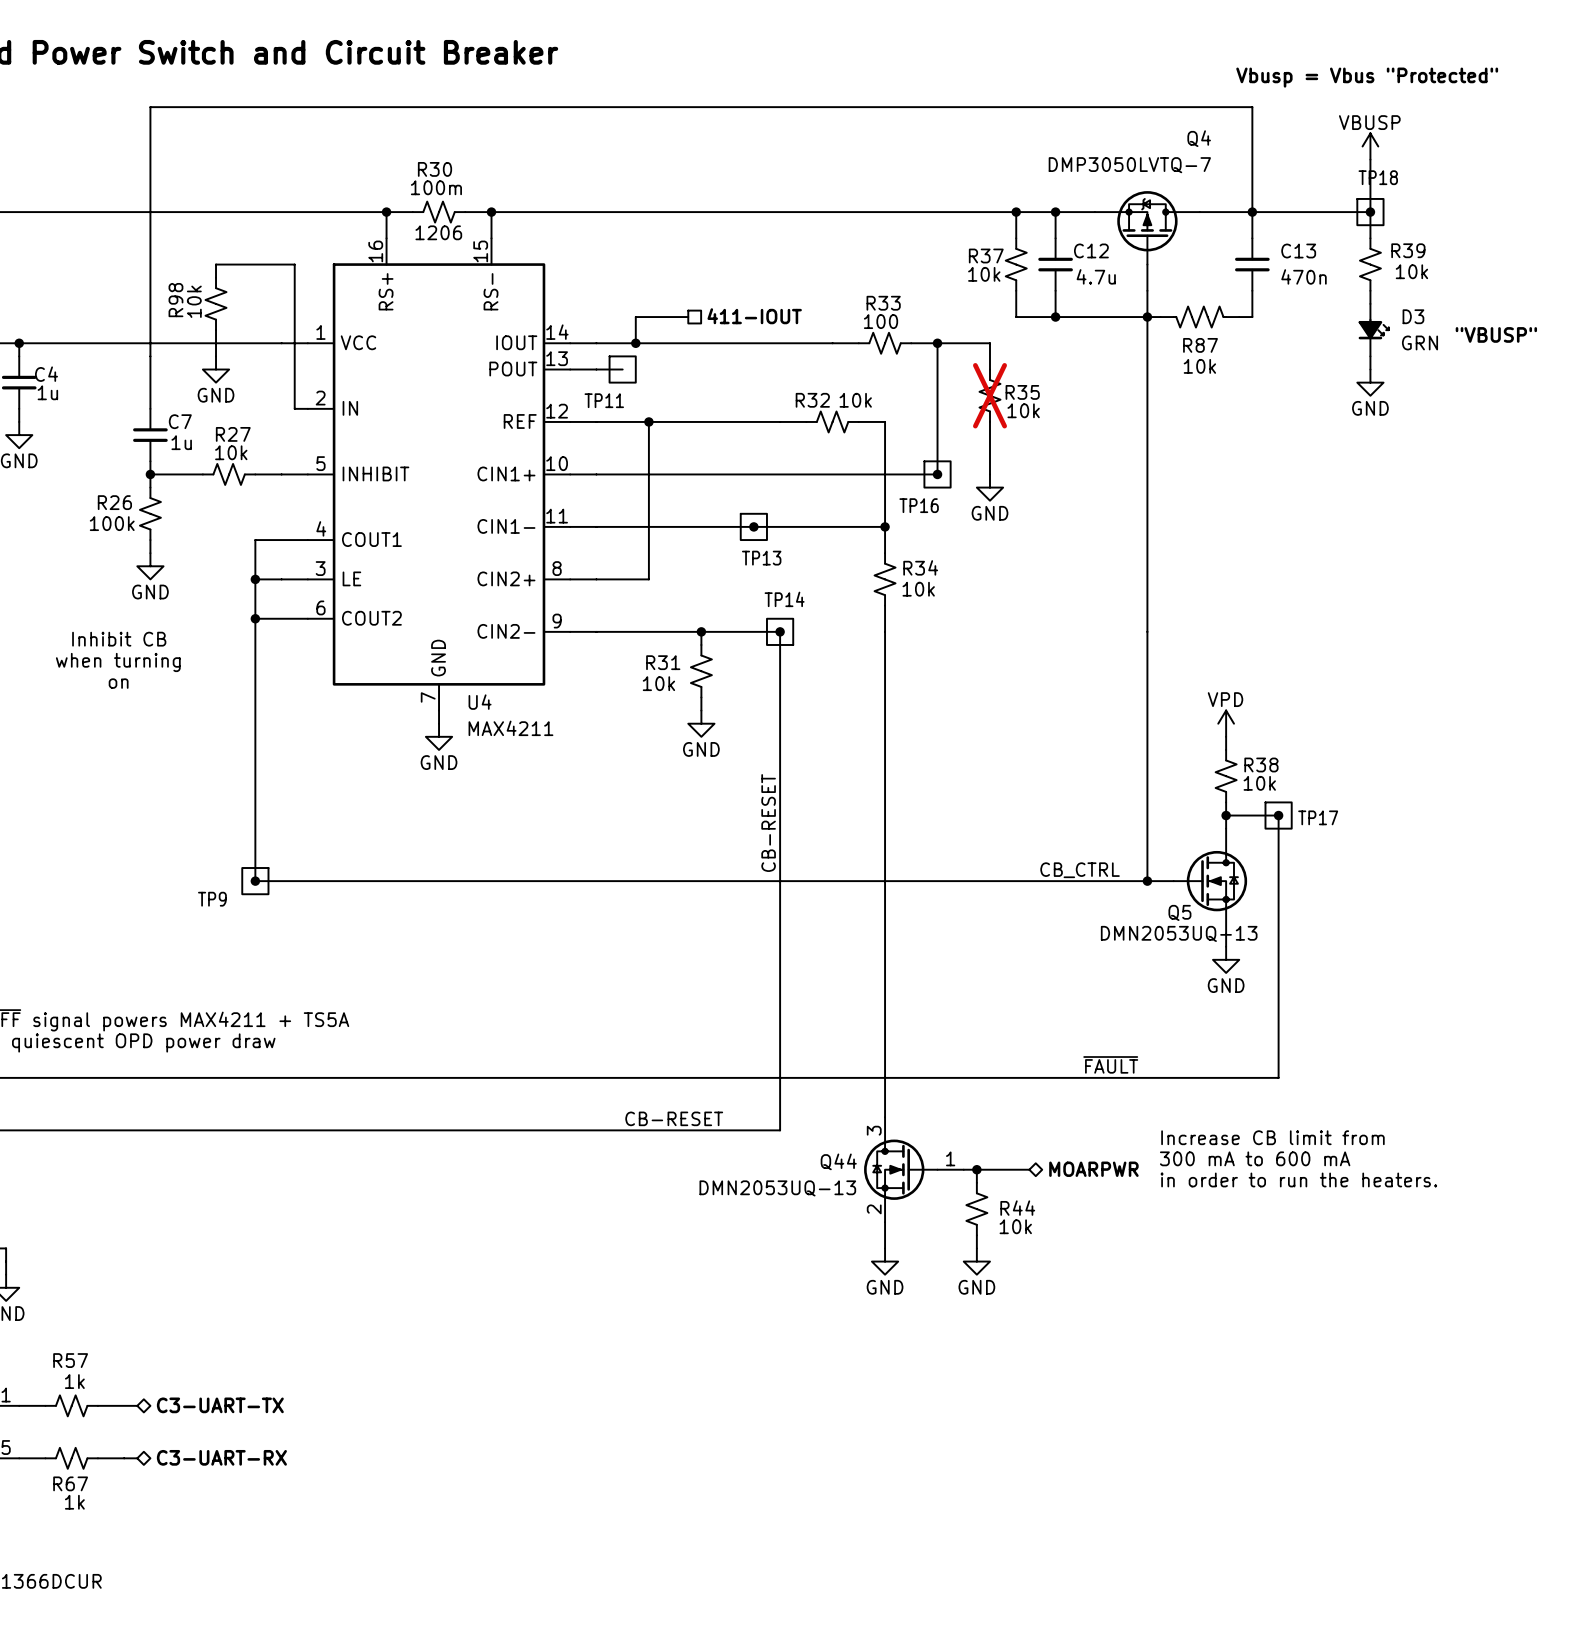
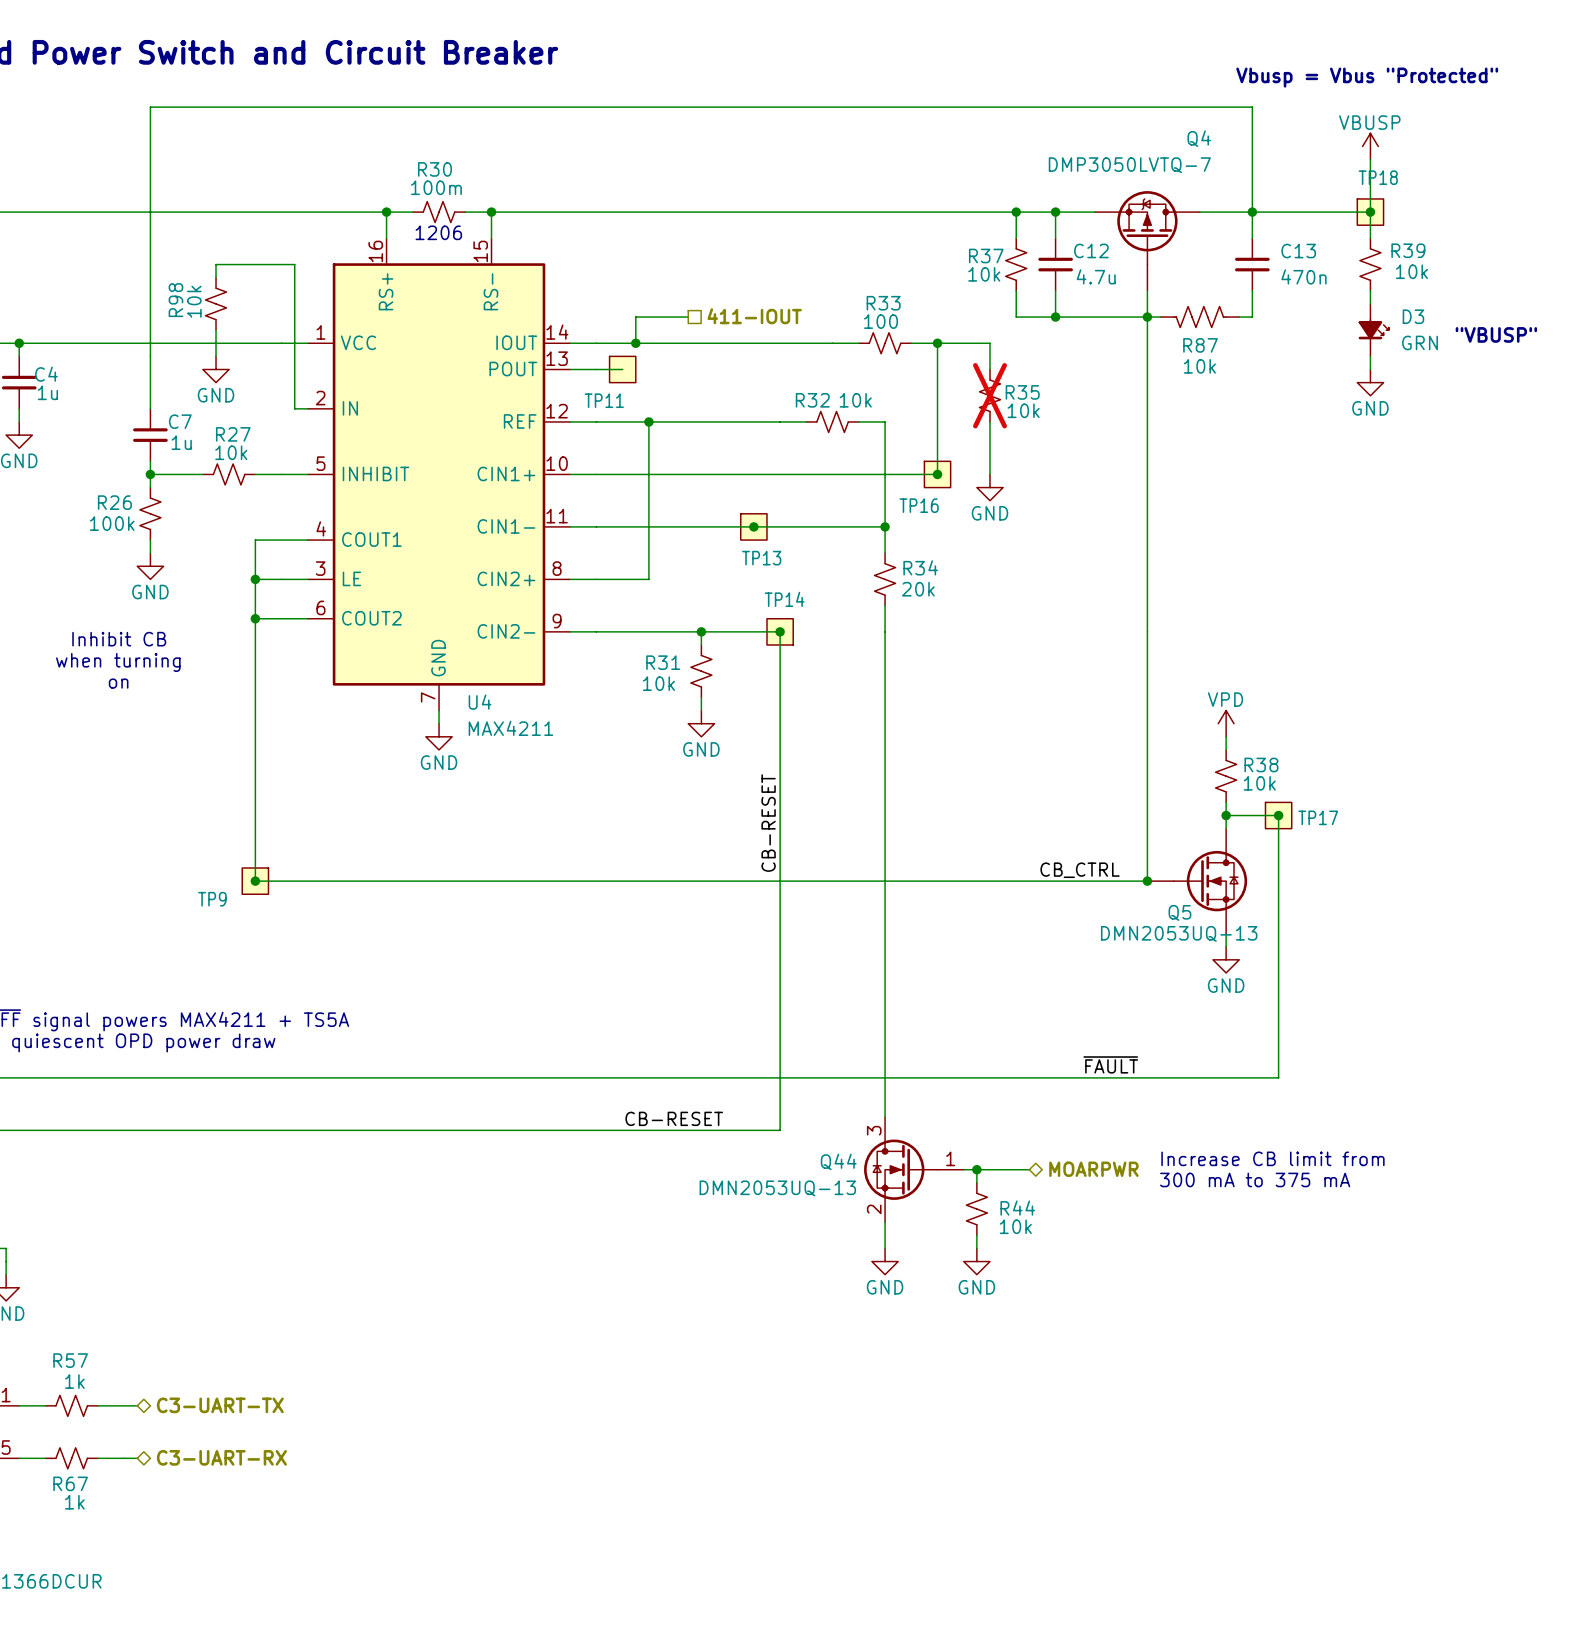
R34 value: 10k (918, 589) -> 20k (918, 589)
text: Increase CB limit from (1272, 1137) -> none
text: 300 mA to 600 mA (1255, 1158) -> Increase CB limit from (1272, 1158)
text: in order to run the heaters. (1298, 1179) -> 300 mA to 375 mA (1255, 1179)

